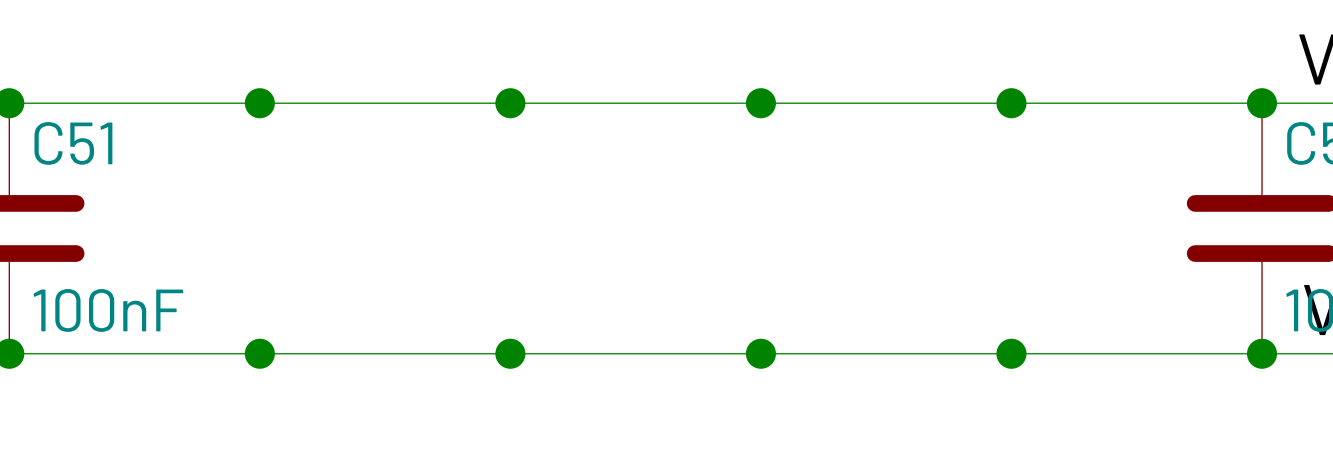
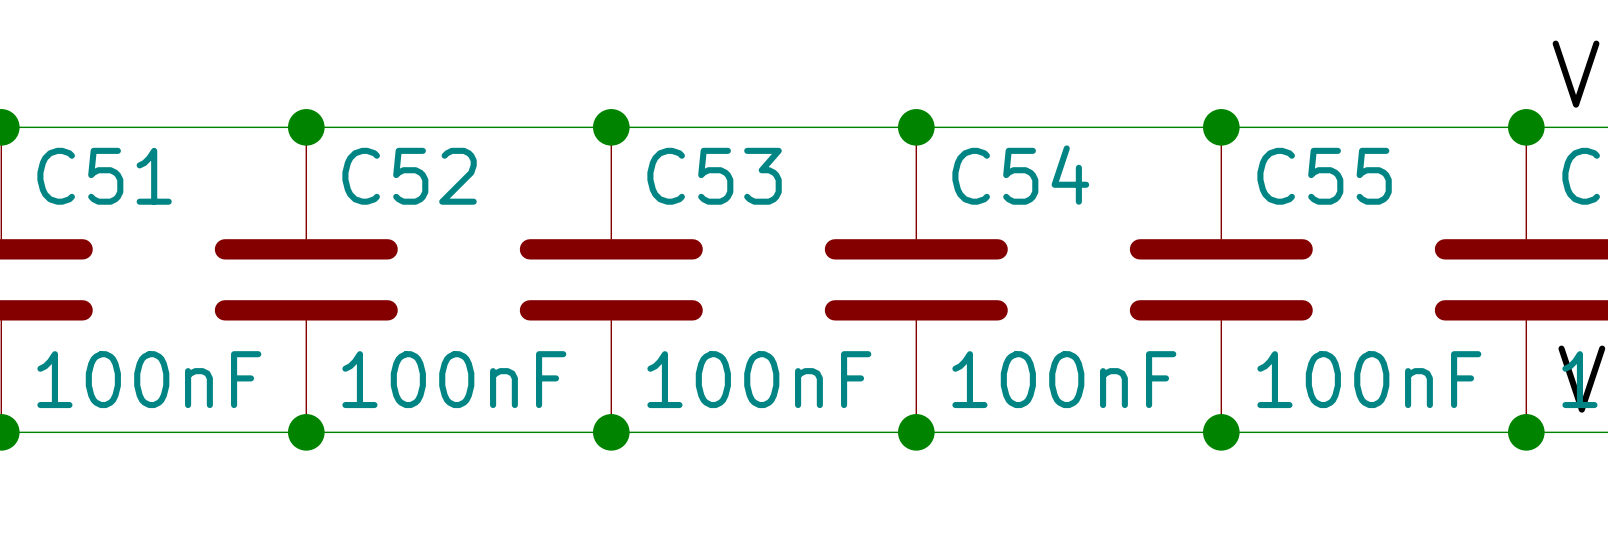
C52: none -> 100nF (306, 279)
C53: none -> 100nF (611, 279)
C54: none -> 100nF (916, 279)
C55: none -> 100nF (1221, 279)

